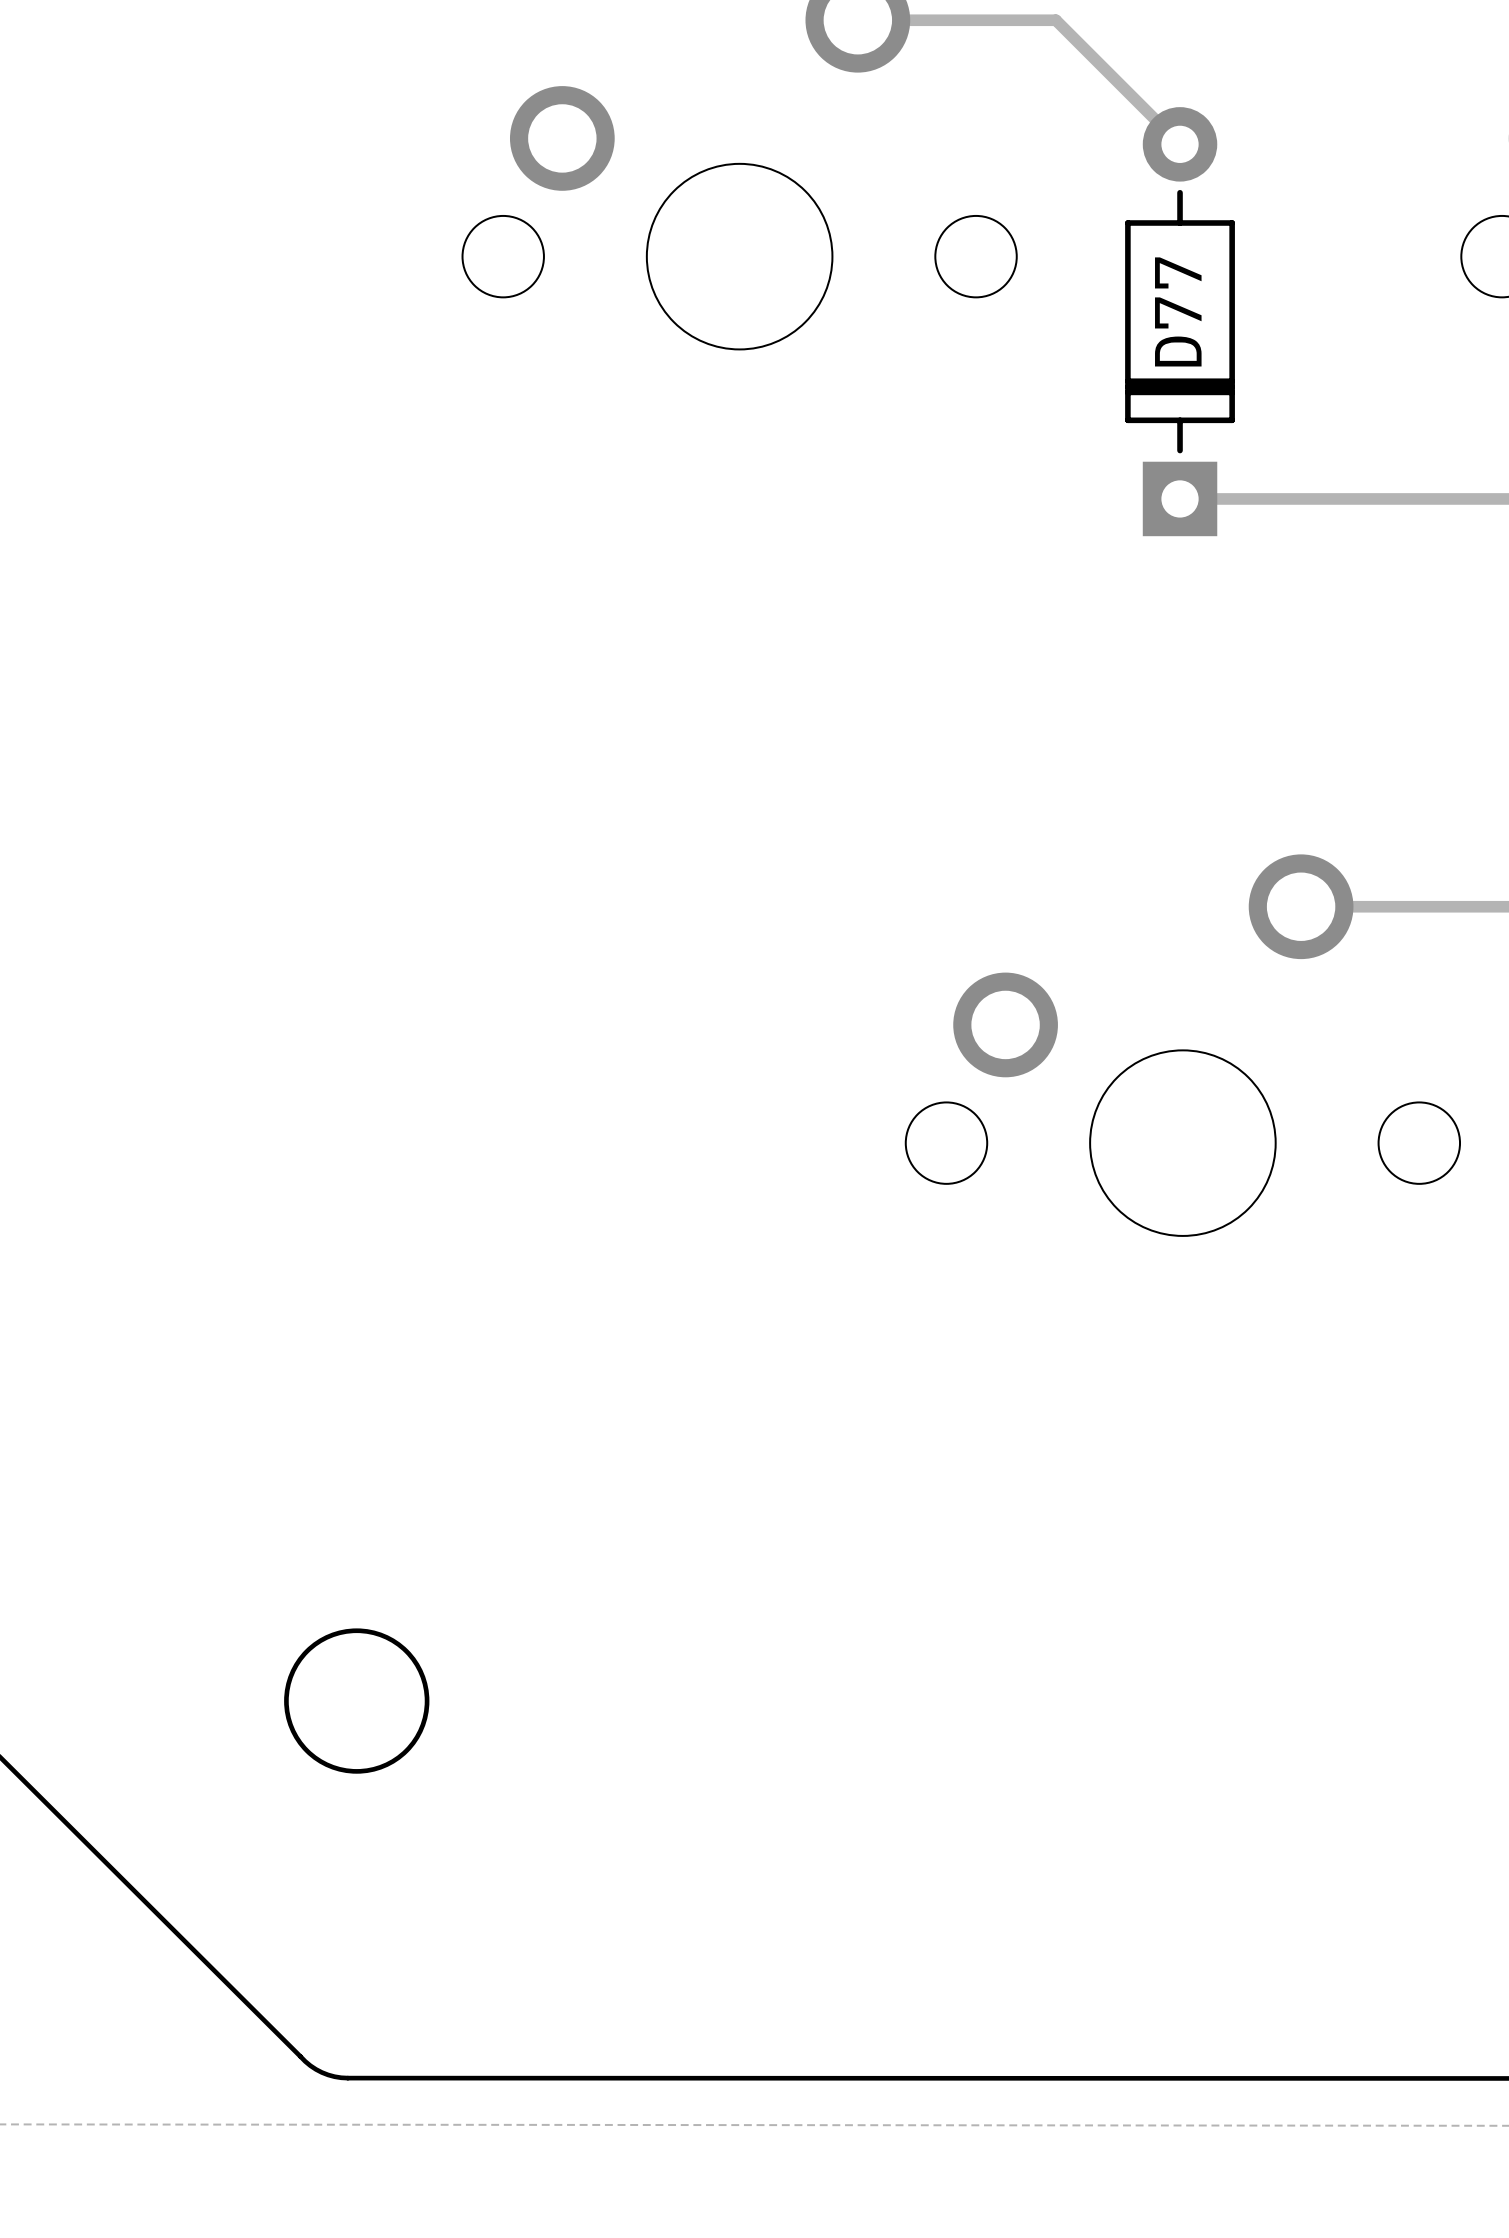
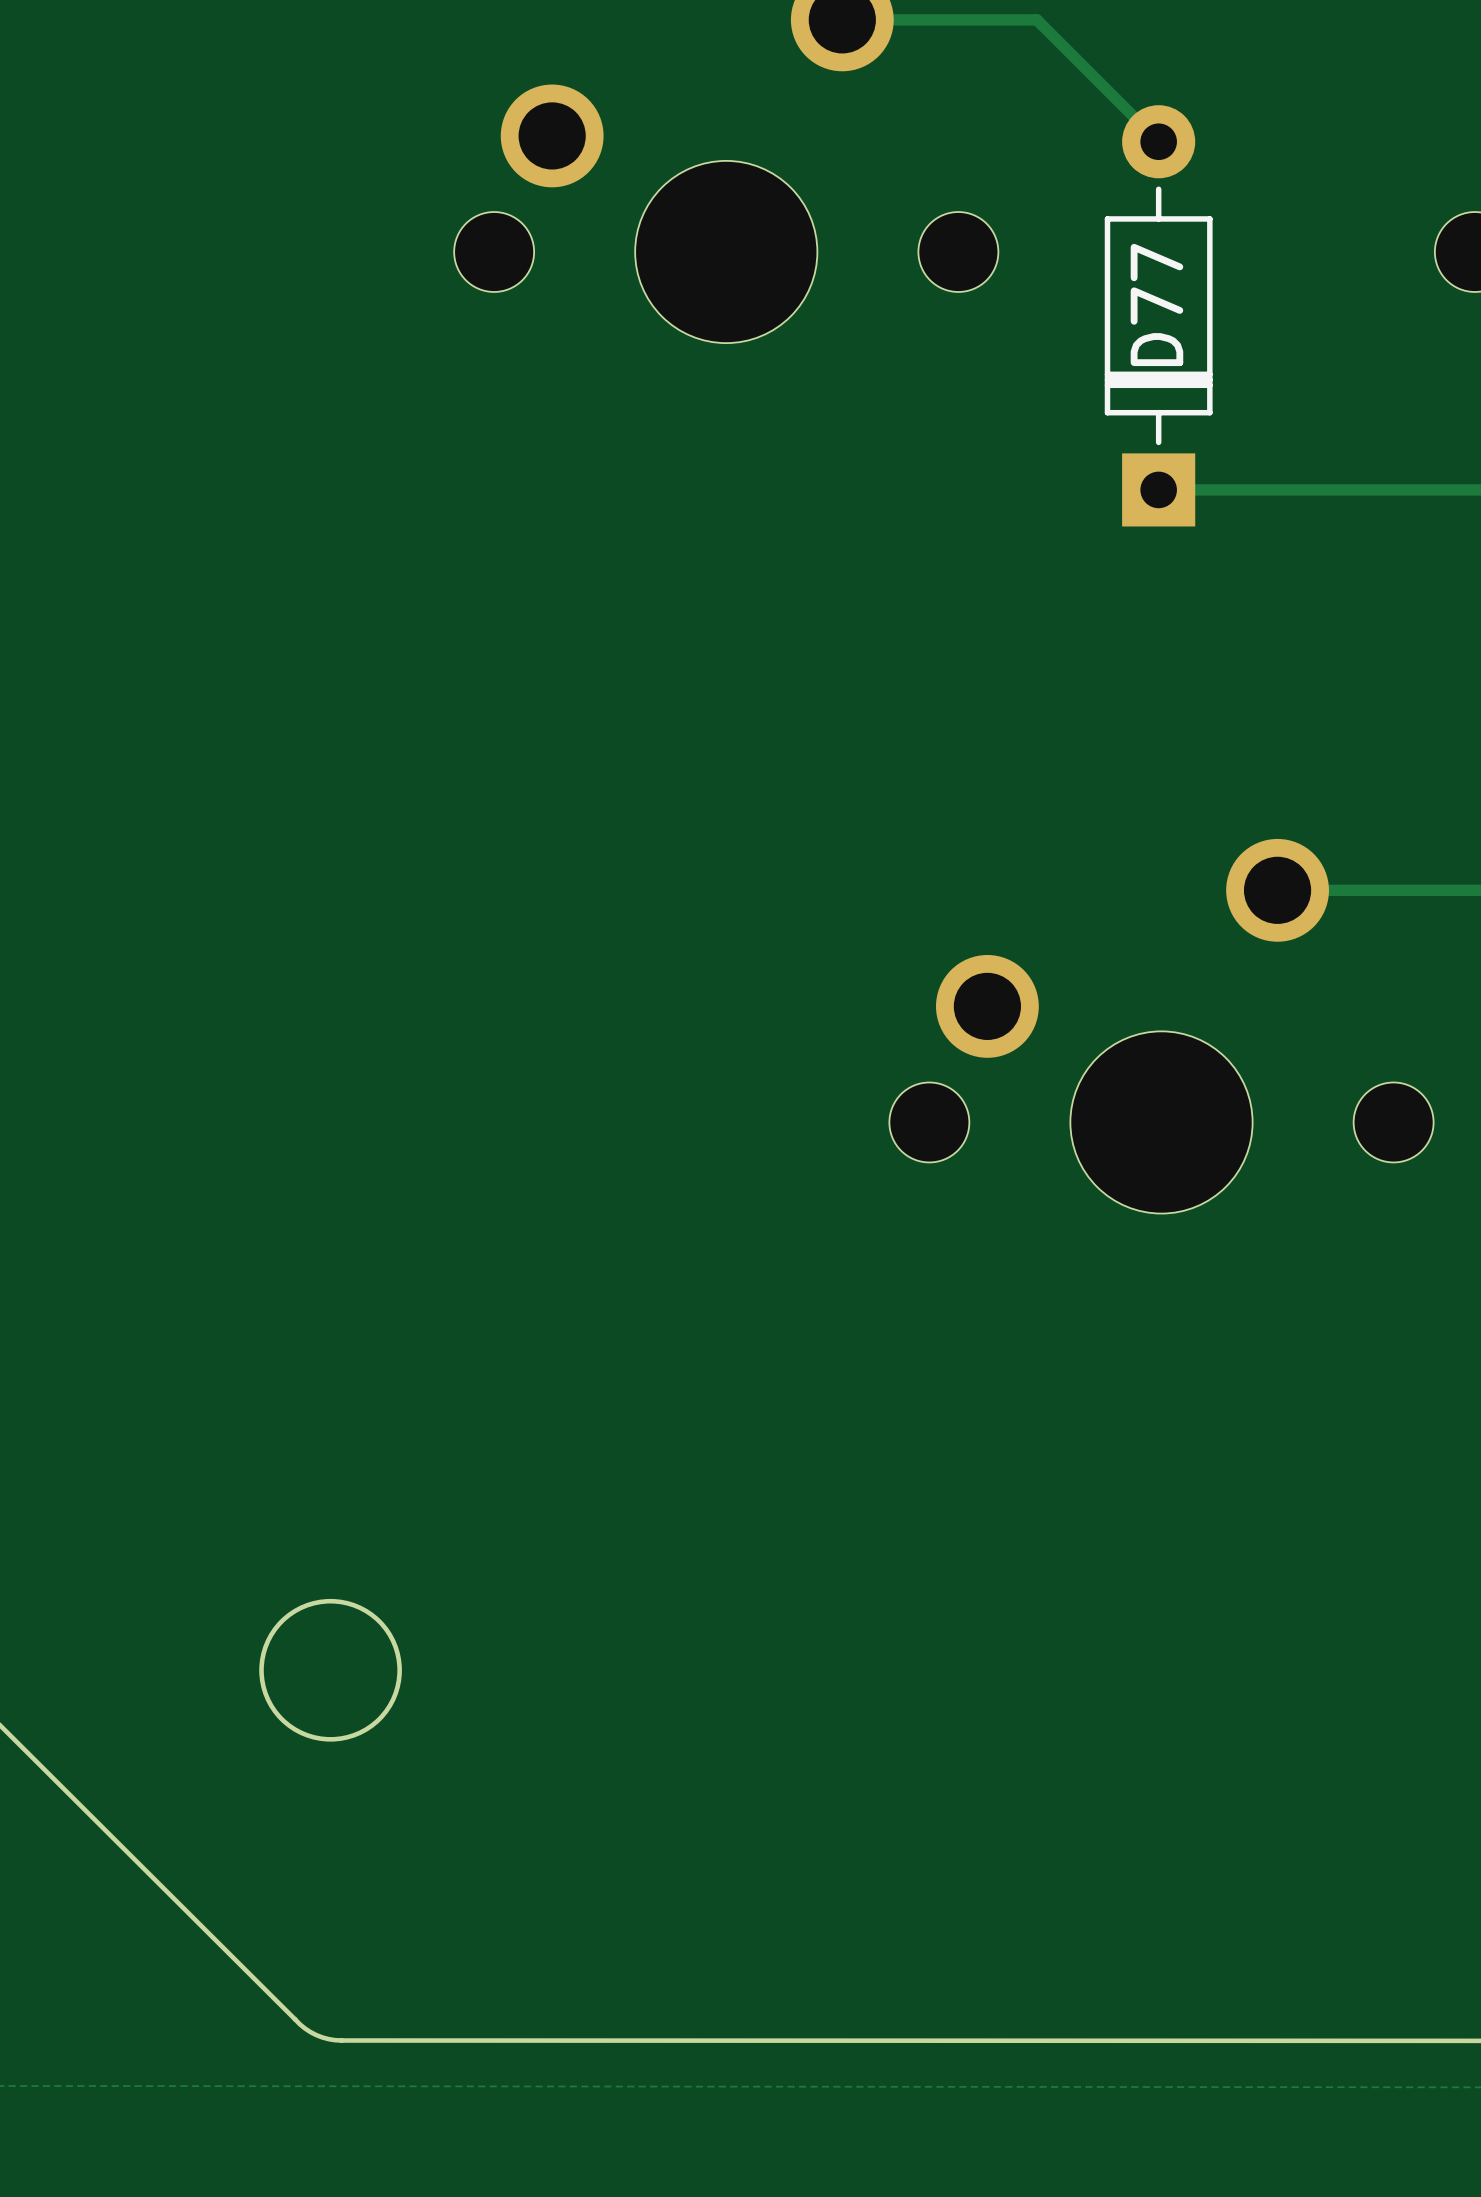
round board edge position: (356, 1701) -> (330, 1670)

